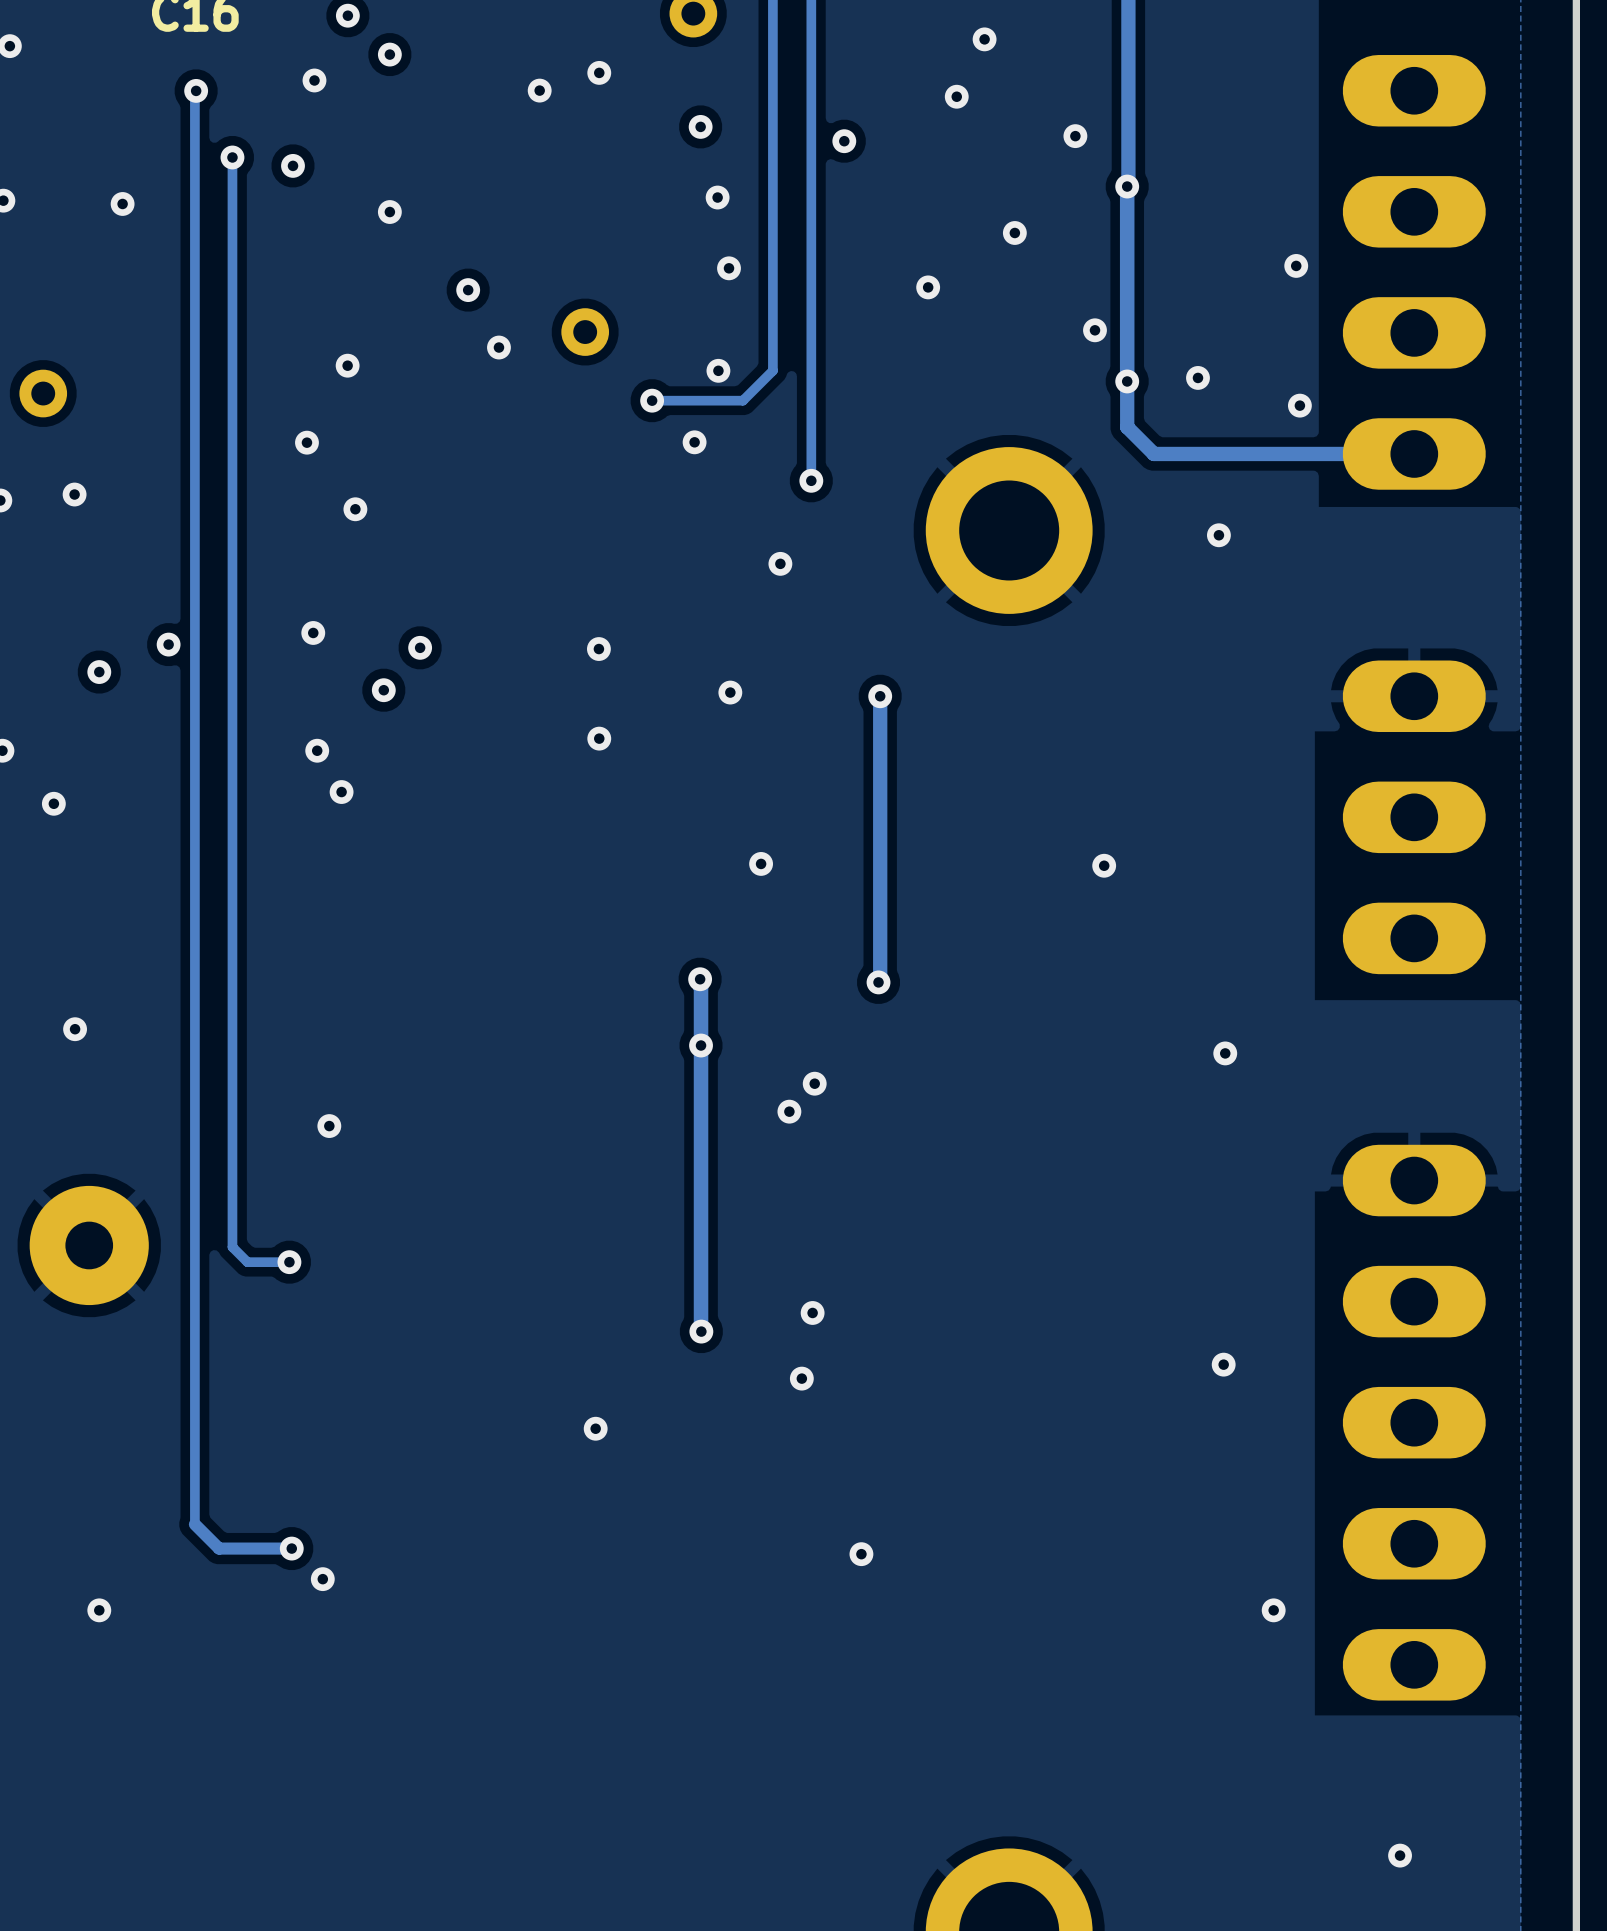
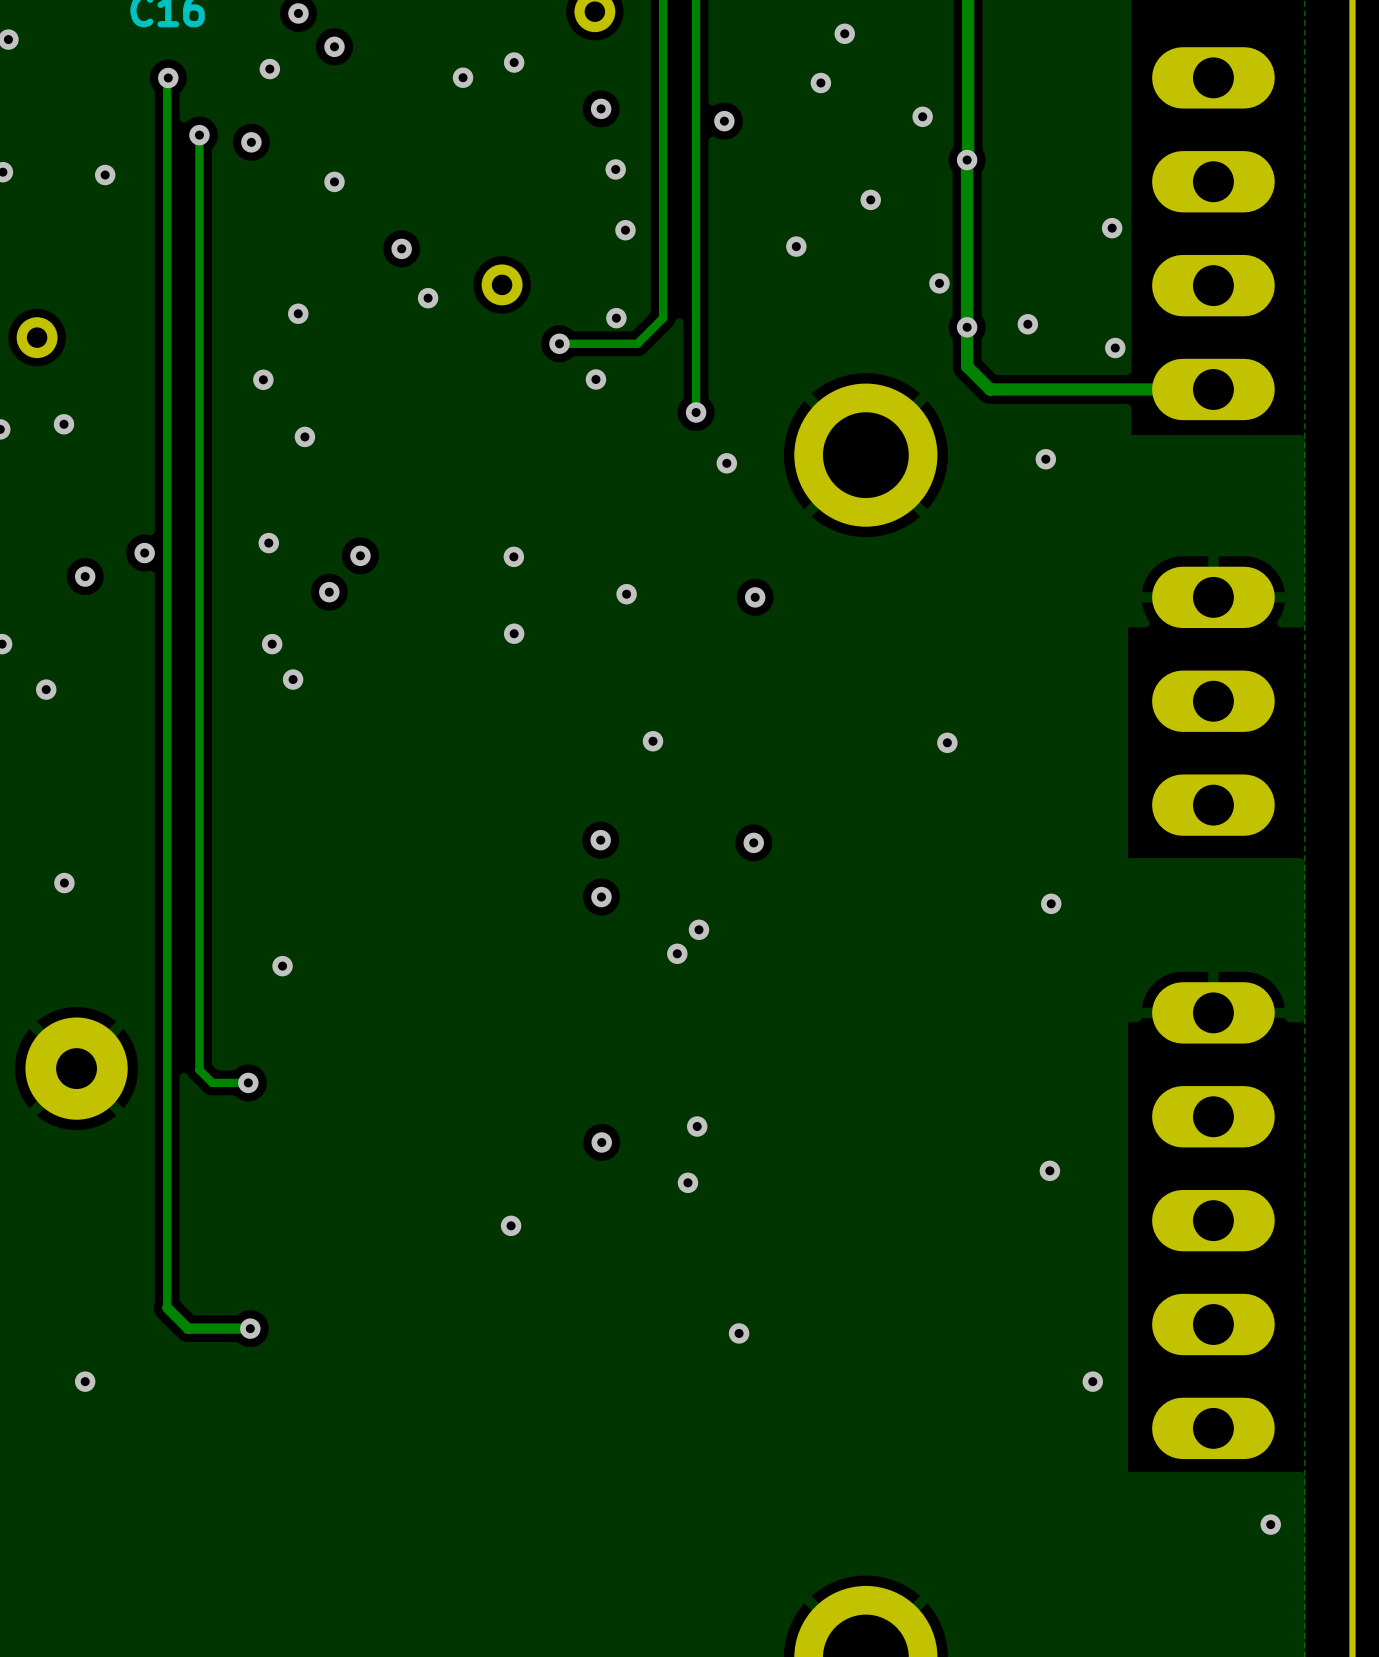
via position: (780, 563) -> (726, 463)
track: (880, 696) (880, 980) (878, 982) -> none
track: (700, 979) (701, 1330) -> none
via: (322, 1579) -> none
via position: (1400, 1855) -> (1270, 1524)

